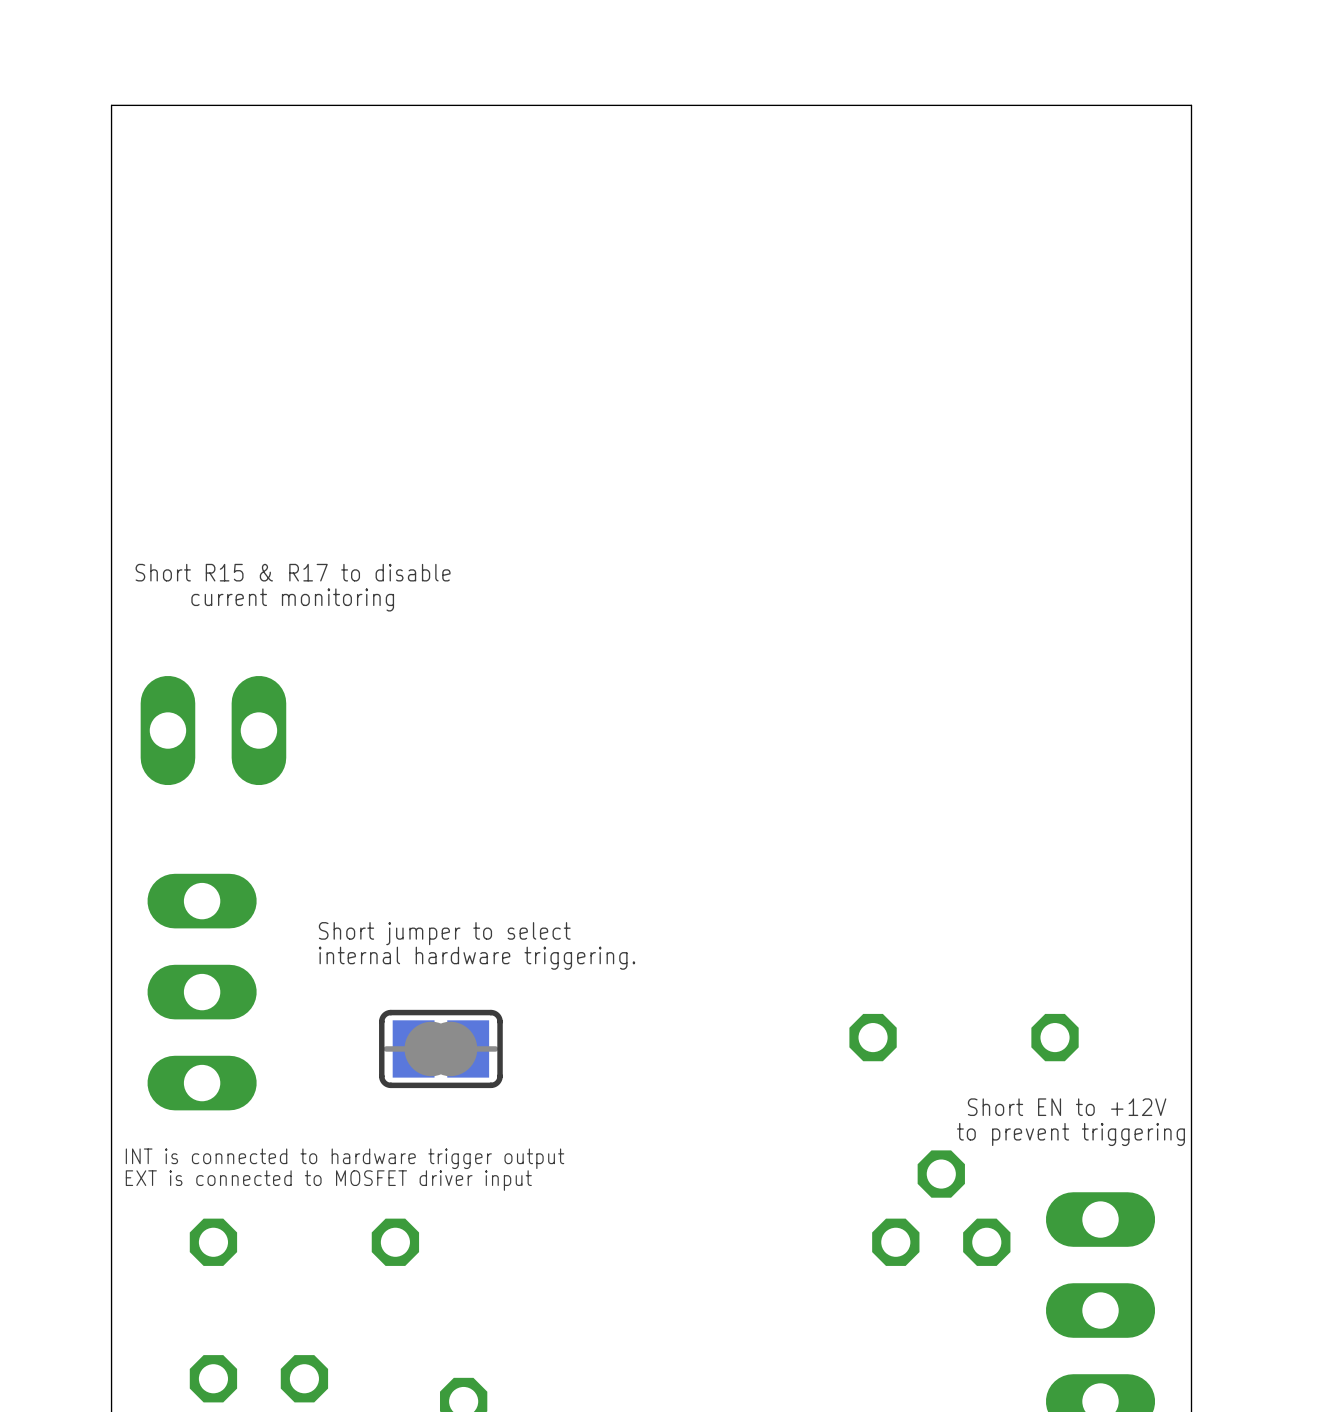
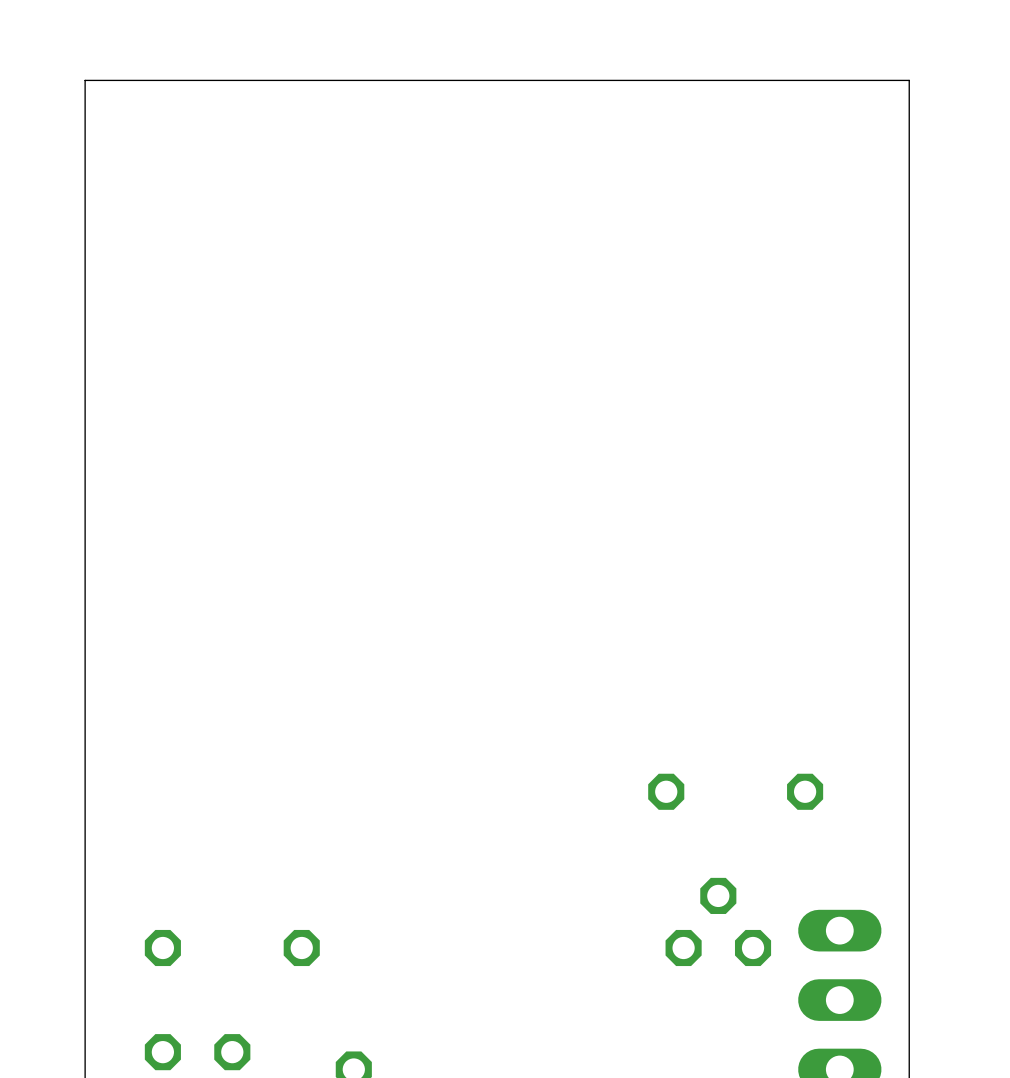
text: Short R15 & R17 to disable (293, 572) -> none
text: current monitoring (292, 599) -> none
part: (213, 730) -> none
text: Short jumper to select (444, 933) -> none
text: internal hardware triggering. (477, 958) -> none
part: (202, 992) -> none
part: (440, 1048) -> none
text: Short EN to +12V (1067, 1107) -> none
text: to prevent triggering (1070, 1134) -> none
text: INT is connected to hardware trigger output (345, 1158) -> none
text: EXT is connected to MOSFET driver input (328, 1180) -> none

